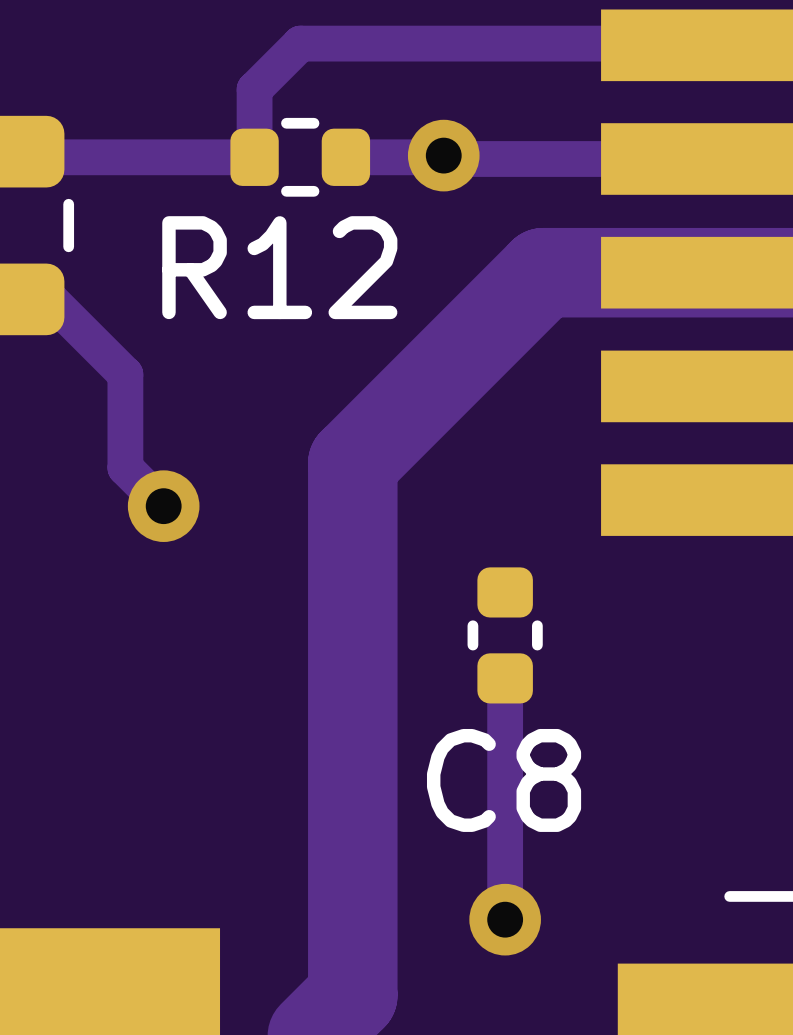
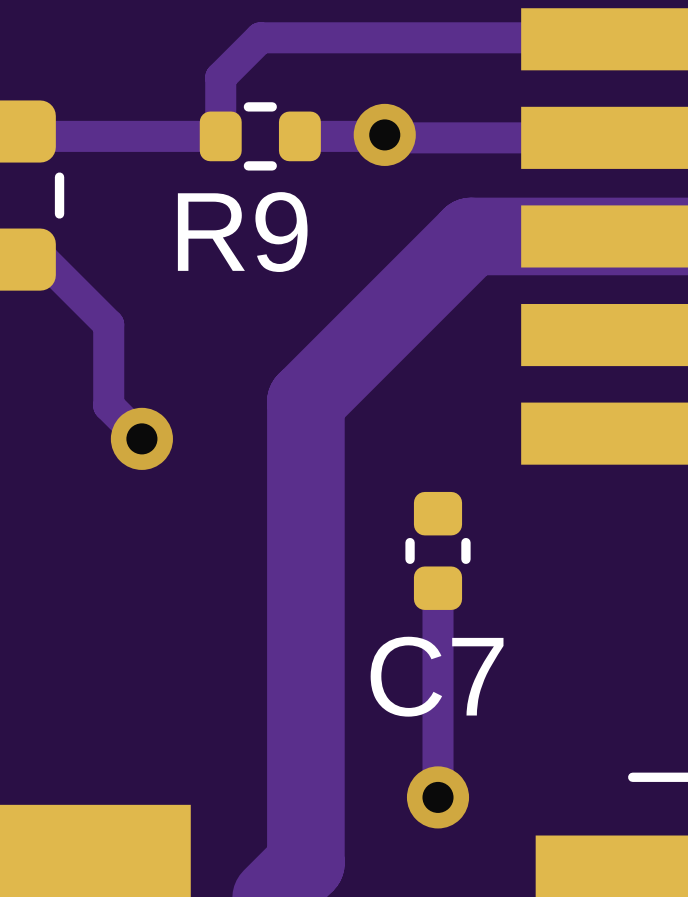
R12 name: R12 (279, 267) -> R9 (242, 232)
C8 name: C8 (504, 780) -> C7 (437, 676)

